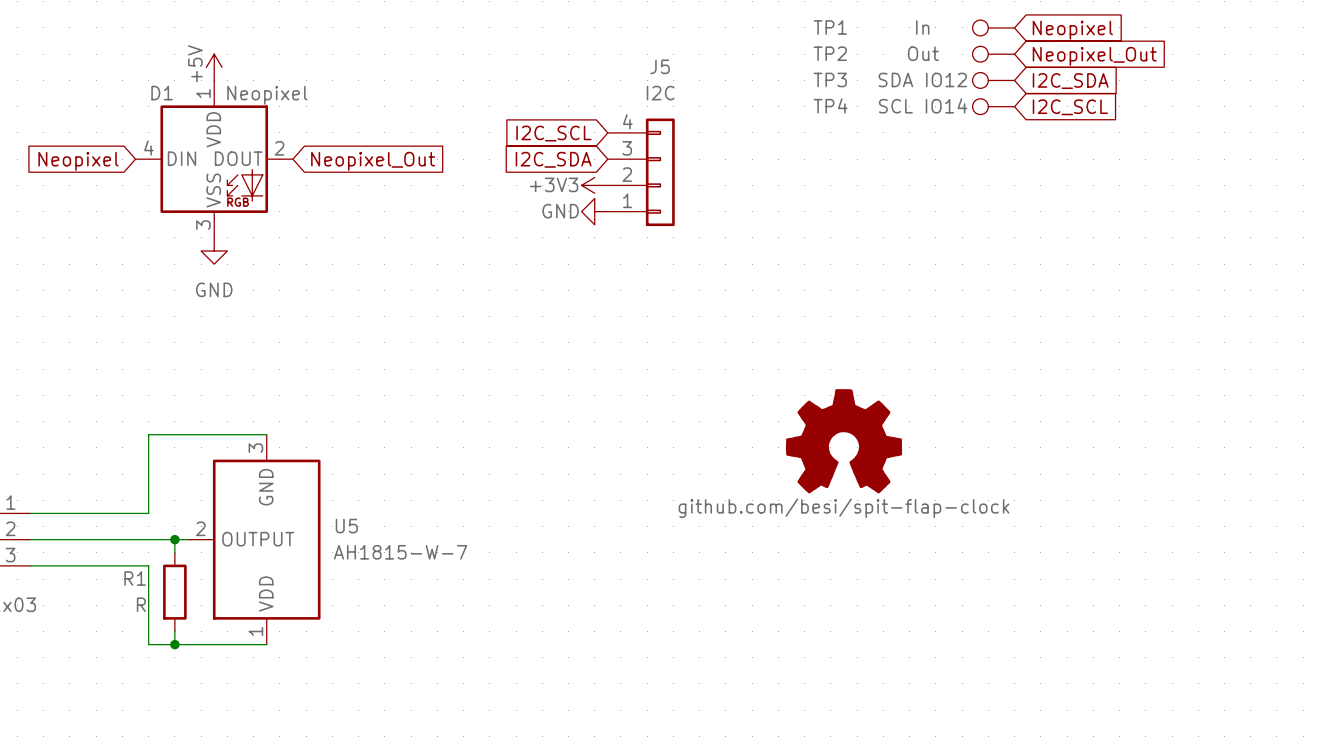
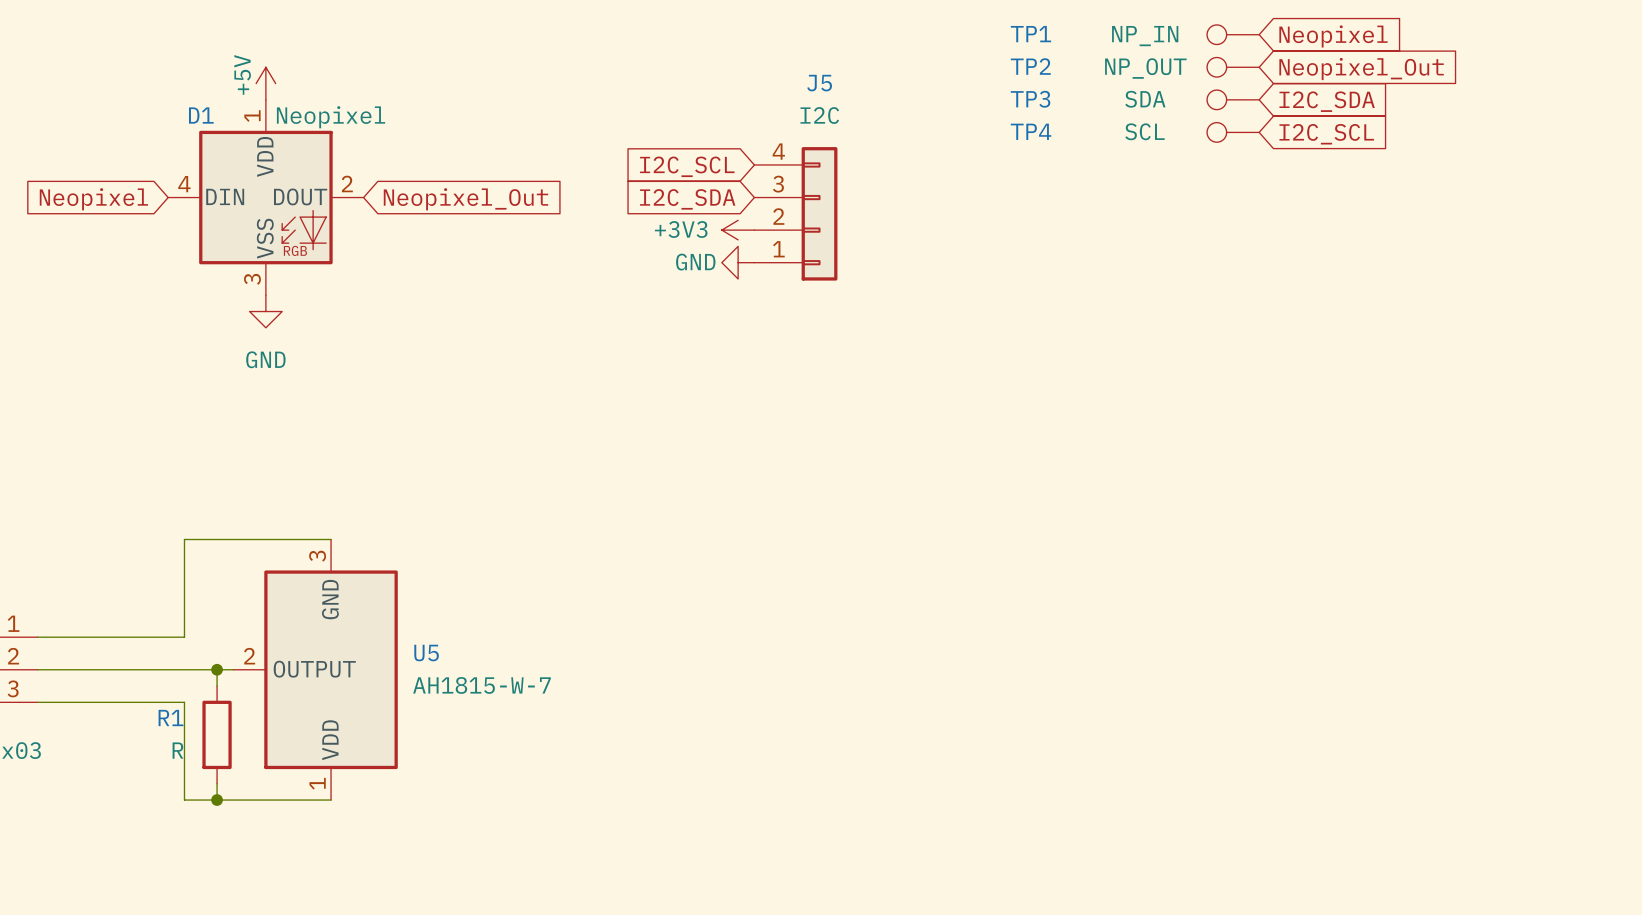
TP1 value: In (922, 27) -> NP_IN (1145, 36)
TP2 value: Out (923, 53) -> NP_OUT (1145, 68)
TP3 value: SDA IO12 (922, 79) -> SDA (1145, 99)
TP4 value: SCL IO14 (923, 105) -> SCL (1144, 131)
part: github.com/besi/spit-flap-clock (844, 441) -> none

